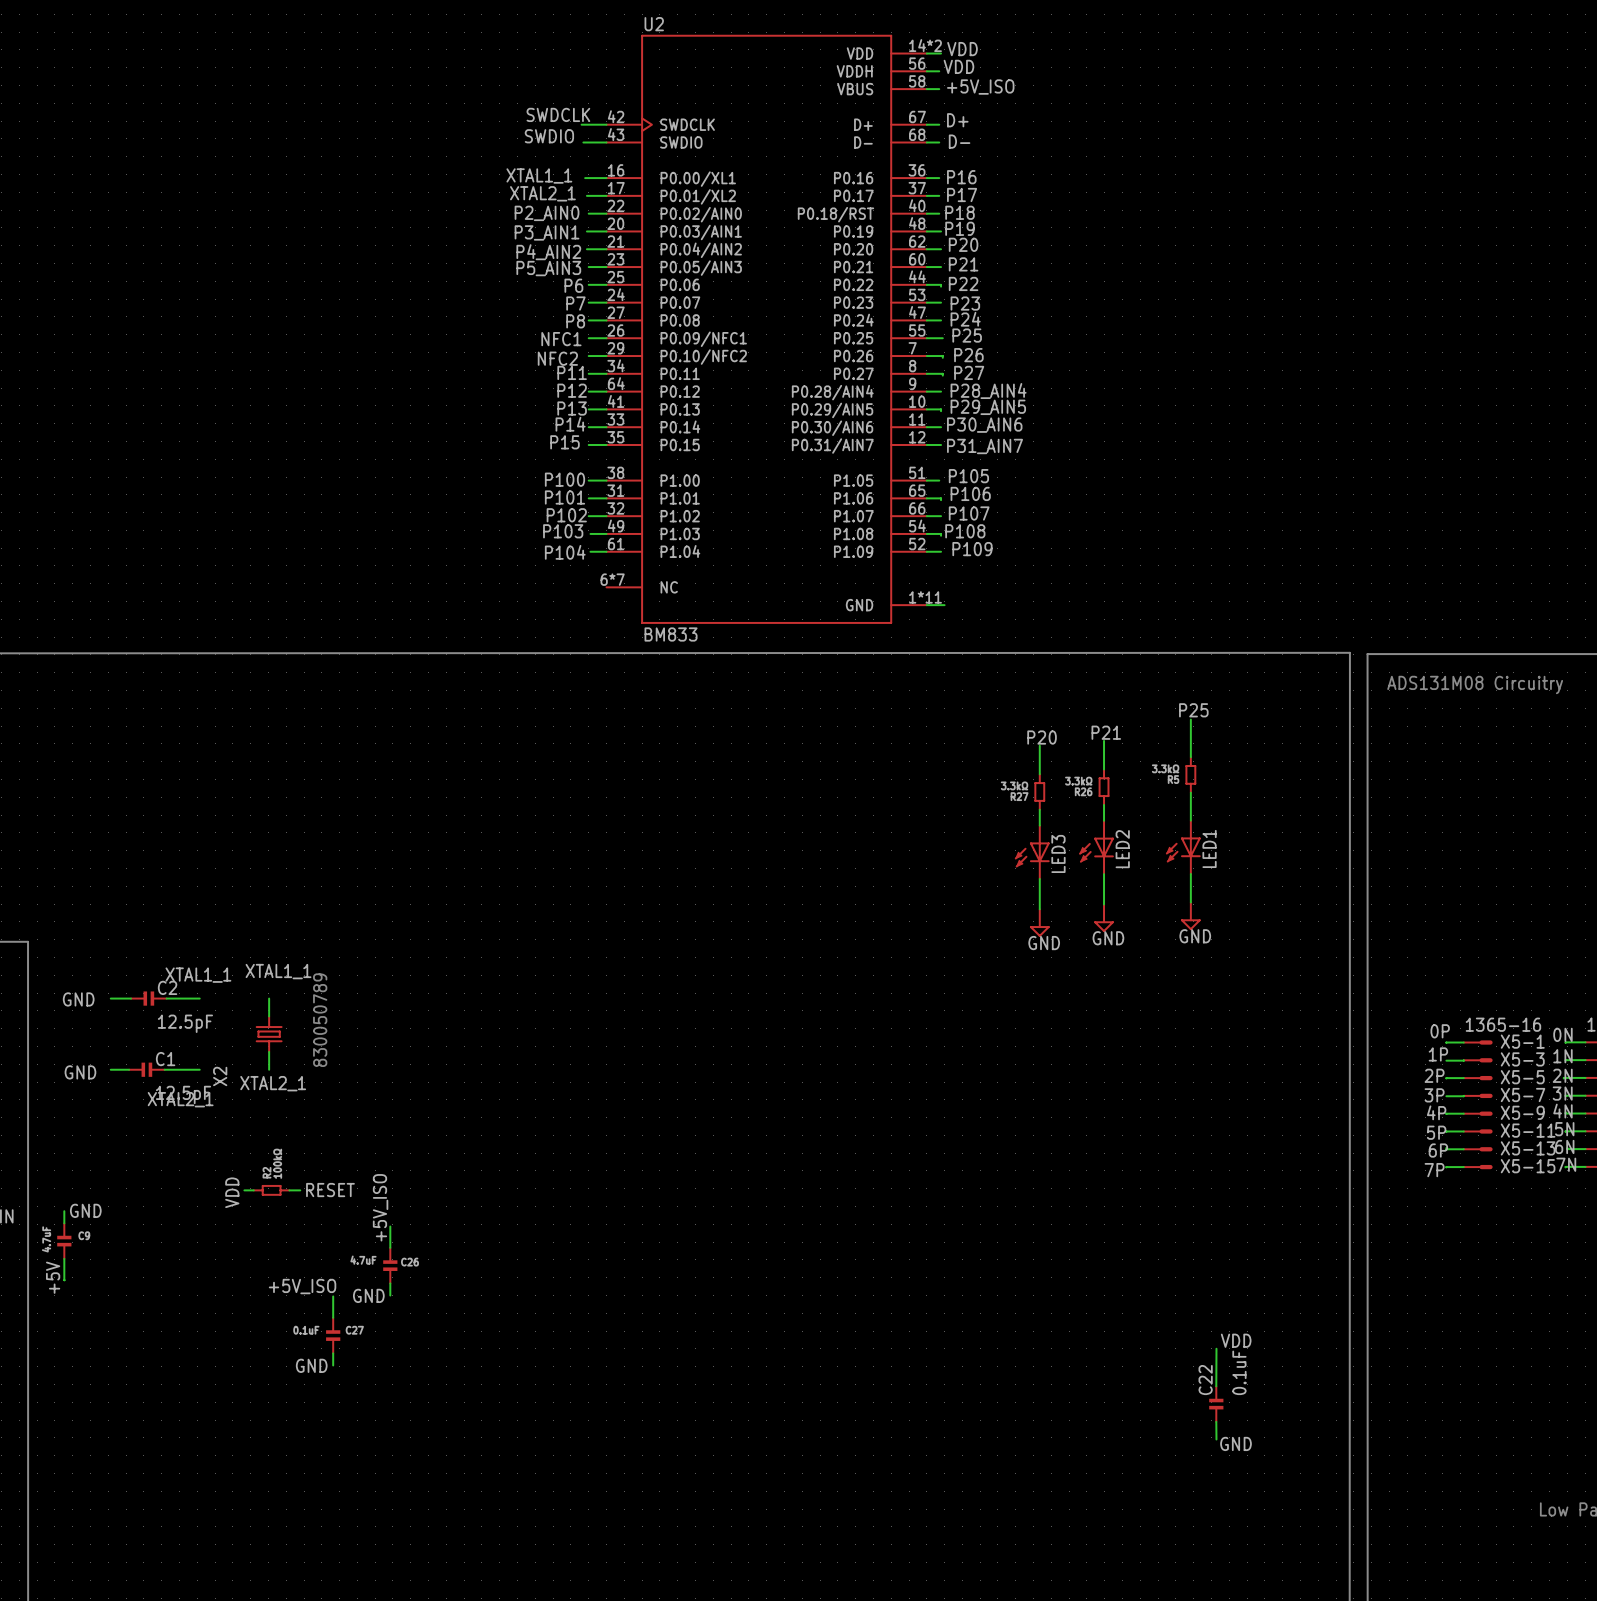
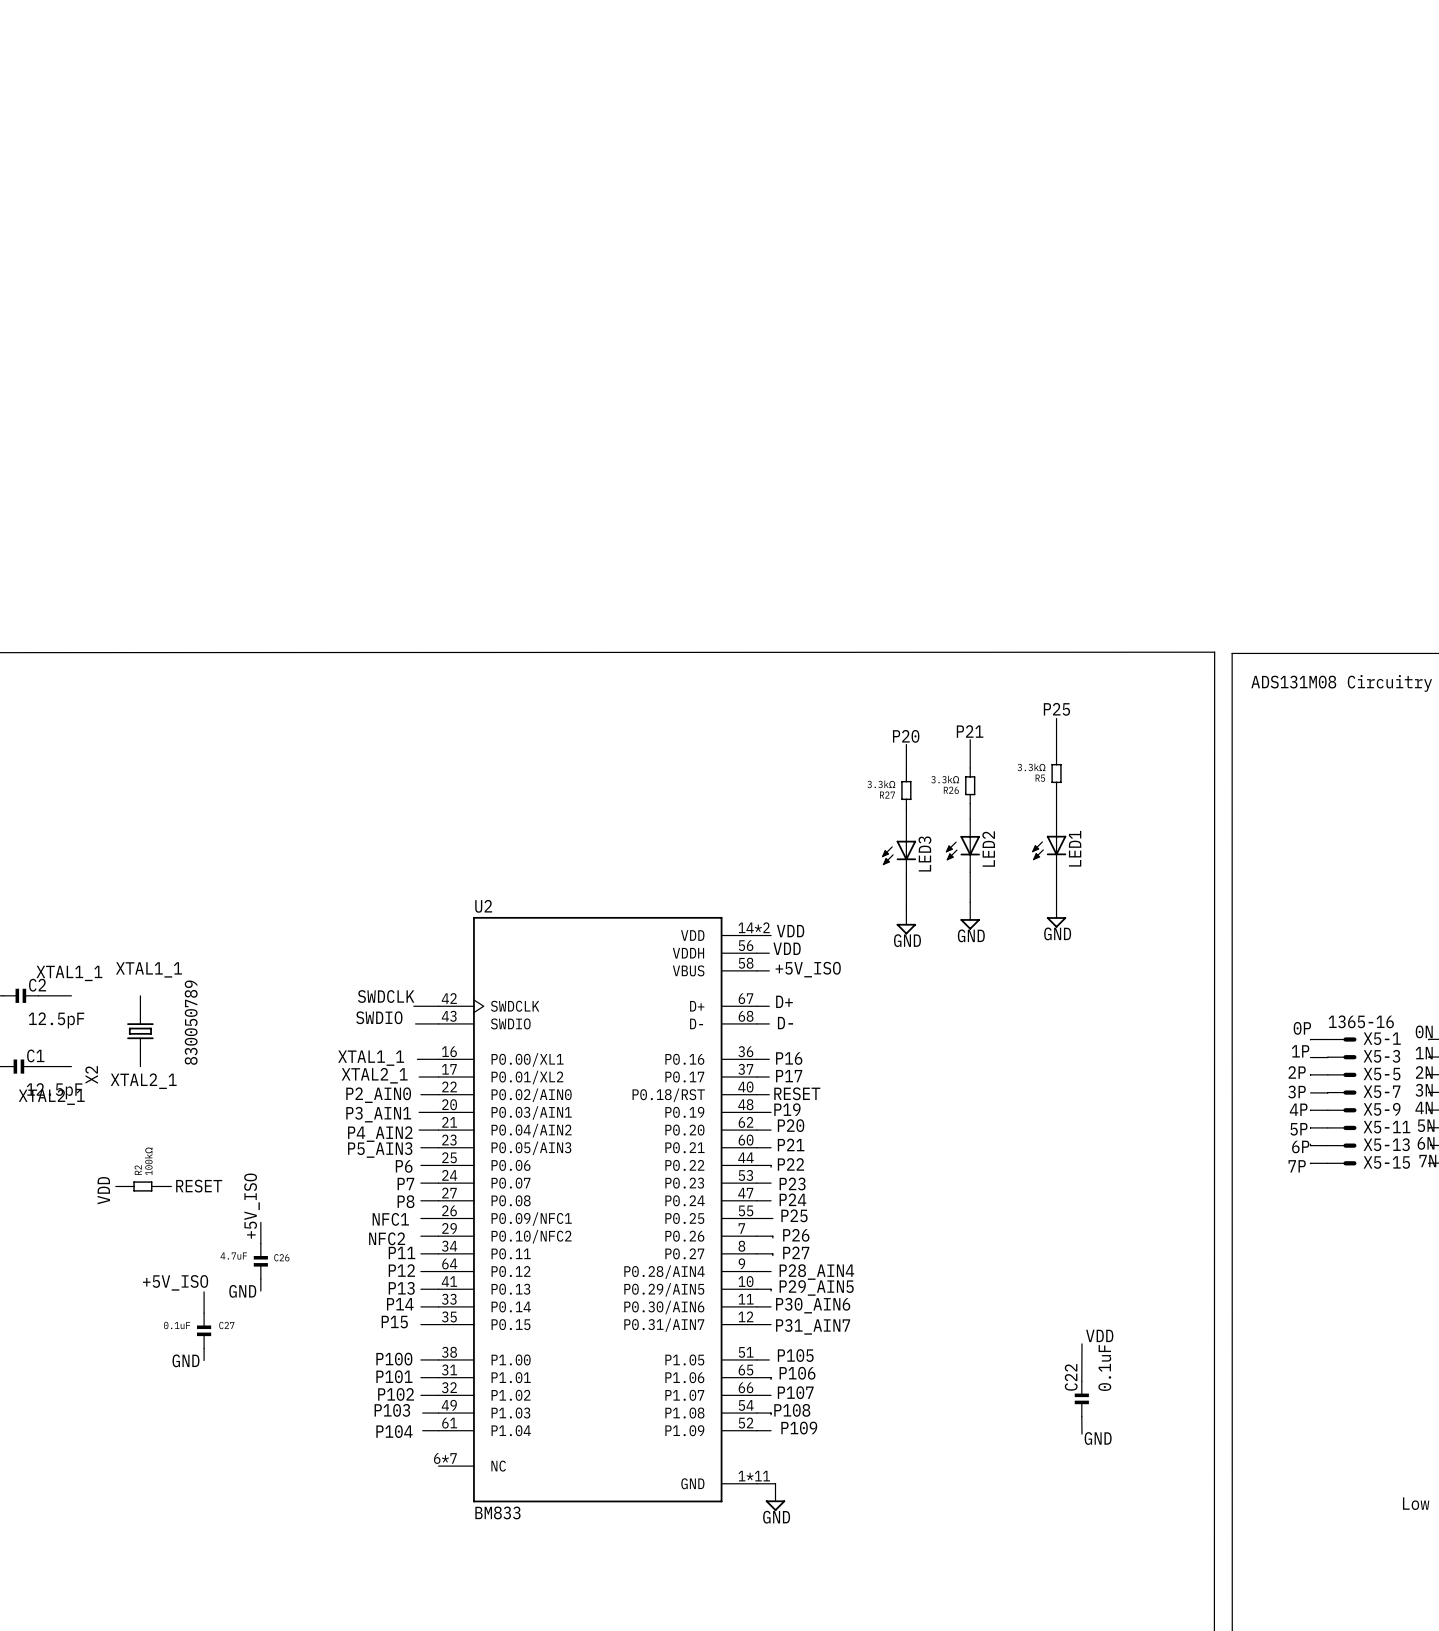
label: VDD (962, 49) -> none
wire: (926, 53) (941, 53) -> none
label: VDD (958, 66) -> none
wire: (926, 71) (939, 71) -> none
label: +5V_ISO (980, 87) -> none
wire: (926, 89) (939, 89) -> none
label: SWDCLK (558, 114) -> none
label: D+ (957, 120) -> none
wire: (581, 124) (606, 124) -> none
wire: (926, 124) (939, 124) -> none
label: SWDIO (549, 136) -> none
label: D- (959, 141) -> none
wire: (583, 142) (606, 142) -> none
wire: (926, 142) (939, 142) -> none
label: XTAL1_1 (539, 176) -> none
label: P16 (961, 177) -> none
wire: (585, 178) (606, 178) -> none
wire: (926, 178) (939, 178) -> none
label: XTAL2_1 (542, 193) -> none
label: P17 (962, 194) -> none
wire: (586, 195) (606, 195) -> none
wire: (926, 195) (939, 195) -> none
label: P18 (960, 212) -> none
label: P2_AIN0 (547, 213) -> none
wire: (588, 213) (606, 213) -> none
wire: (926, 213) (939, 213) -> none
label: P19 (960, 228) -> none
wire: (586, 231) (606, 231) -> none
wire: (926, 231) (941, 231) -> none
label: P3_AIN1 (547, 232) -> none
label: P20 (963, 244) -> none
wire: (586, 249) (606, 249) -> none
wire: (926, 249) (941, 249) -> none
label: P4_AIN2 (548, 252) -> none
label: P21 (963, 264) -> none
wire: (588, 267) (606, 267) -> none
wire: (926, 267) (941, 267) -> none
label: P5_AIN3 (548, 268) -> none
label: P22 (963, 283) -> none
wire: (588, 284) (606, 284) -> none
wire: (926, 284) (941, 284) (941, 286) -> none
label: P6 (573, 285) -> none
wire: (588, 302) (606, 302) -> none
wire: (926, 302) (941, 302) -> none
label: P7 (575, 303) -> none
label: P23 (965, 303) -> none
label: P24 (965, 319) -> none
wire: (588, 320) (606, 320) -> none
wire: (926, 320) (941, 320) -> none
label: P8 (575, 321) -> none
U2 position: (766, 329) -> (597, 1209)
label: P25 (967, 335) -> none
wire: (588, 338) (606, 338) -> none
wire: (926, 338) (942, 338) -> none
label: NFC1 (561, 339) -> none
label: P26 (968, 355) -> none
wire: (588, 356) (606, 356) -> none
wire: (926, 356) (942, 356) (942, 357) -> none
label: NFC2 (557, 358) -> none
label: P11 (572, 372) -> none
label: P27 (969, 372) -> none
wire: (588, 373) (606, 373) -> none
wire: (926, 373) (942, 373) (942, 375) -> none
label: P12 (572, 390) -> none
wire: (588, 391) (606, 391) -> none
wire: (926, 391) (941, 391) -> none
label: P28_AIN4 (988, 391) -> none
label: P29_AIN5 (988, 407) -> none
label: P13 (572, 408) -> none
wire: (588, 409) (606, 409) -> none
wire: (926, 409) (941, 409) (941, 411) -> none
label: P14 (570, 424) -> none
label: P30_AIN6 (984, 425) -> none
wire: (588, 427) (606, 427) -> none
wire: (926, 427) (941, 427) -> none
label: P15 (564, 442) -> none
wire: (588, 444) (606, 444) -> none
wire: (926, 444) (941, 444) -> none
label: P31_AIN7 (985, 446) -> none
label: P105 (968, 476) -> none
label: P100 (564, 479) -> none
wire: (588, 480) (606, 480) -> none
wire: (926, 480) (939, 480) -> none
label: P106 (970, 493) -> none
label: P101 (564, 497) -> none
wire: (588, 498) (606, 498) -> none
wire: (926, 498) (941, 498) (941, 500) -> none
label: P107 (969, 513) -> none
label: P102 (566, 515) -> none
wire: (588, 516) (606, 516) -> none
wire: (926, 516) (941, 516) -> none
label: P103 (563, 531) -> none
label: P108 (965, 531) -> none
wire: (590, 533) (606, 533) -> none
wire: (926, 533) (941, 533) (941, 535) -> none
label: P109 (972, 549) -> none
wire: (590, 551) (606, 551) -> none
wire: (926, 551) (941, 551) -> none
label: P104 (565, 552) -> none
wire: (926, 605) (944, 605) -> none
label: none -> VDD (790, 931)
wire: none -> (756, 935) (771, 935)
label: none -> VDD (787, 948)
wire: none -> (756, 953) (769, 953)
label: none -> +5V_ISO (808, 969)
wire: none -> (756, 970) (769, 970)
label: none -> SWDCLK (386, 996)
label: none -> D+ (784, 1001)
wire: none -> (413, 1006) (438, 1006)
wire: none -> (756, 1006) (769, 1006)
label: none -> SWDIO (379, 1017)
label: none -> D- (785, 1023)
wire: none -> (415, 1023) (438, 1023)
wire: none -> (756, 1023) (769, 1023)
label: none -> XTAL1_1 (371, 1058)
label: none -> P16 (789, 1058)
wire: none -> (417, 1059) (438, 1059)
wire: none -> (756, 1059) (769, 1059)
label: none -> XTAL2_1 (374, 1075)
label: none -> P17 (789, 1076)
wire: none -> (419, 1077) (438, 1077)
wire: none -> (756, 1077) (769, 1077)
label: none -> P2_AIN0 (378, 1095)
label: none -> RESET (797, 1093)
wire: none -> (420, 1094) (438, 1094)
wire: none -> (756, 1094) (769, 1094)
label: none -> P19 (787, 1109)
wire: none -> (419, 1112) (438, 1112)
wire: none -> (756, 1112) (771, 1112)
label: none -> P3_AIN1 (378, 1114)
label: none -> P20 (791, 1125)
wire: none -> (419, 1130) (438, 1130)
wire: none -> (756, 1130) (771, 1130)
label: none -> P4_AIN2 (380, 1134)
label: none -> P21 (791, 1144)
wire: none -> (420, 1147) (438, 1147)
wire: none -> (756, 1147) (771, 1147)
label: none -> P5_AIN3 (380, 1150)
label: none -> P22 (790, 1164)
wire: none -> (420, 1165) (438, 1165)
wire: none -> (756, 1165) (771, 1165) (771, 1167)
label: none -> P6 (404, 1166)
label: none -> P7 (405, 1184)
wire: none -> (420, 1183) (438, 1183)
wire: none -> (756, 1183) (771, 1183)
label: none -> P23 (792, 1184)
label: none -> P24 (792, 1199)
wire: none -> (420, 1200) (438, 1200)
wire: none -> (756, 1200) (771, 1200)
label: none -> P8 (406, 1201)
label: none -> P25 (794, 1215)
wire: none -> (420, 1218) (438, 1218)
wire: none -> (756, 1218) (772, 1218)
label: none -> NFC1 (390, 1219)
label: none -> P26 (796, 1235)
wire: none -> (420, 1236) (438, 1236)
wire: none -> (756, 1236) (772, 1236) (772, 1237)
label: none -> NFC2 (387, 1238)
label: none -> P11 (402, 1252)
label: none -> P27 (796, 1252)
wire: none -> (420, 1253) (438, 1253)
wire: none -> (756, 1253) (772, 1253) (772, 1255)
label: none -> P12 (401, 1270)
wire: none -> (420, 1271) (438, 1271)
wire: none -> (756, 1271) (771, 1271)
label: none -> P28_AIN4 (816, 1272)
label: none -> P29_AIN5 (816, 1287)
label: none -> P13 (401, 1288)
wire: none -> (420, 1289) (438, 1289)
wire: none -> (756, 1289) (771, 1289) (771, 1291)
label: none -> P14 (400, 1304)
label: none -> P30_AIN6 (813, 1305)
wire: none -> (420, 1306) (438, 1306)
wire: none -> (756, 1306) (771, 1306)
label: none -> P15 (394, 1322)
wire: none -> (420, 1324) (438, 1324)
wire: none -> (756, 1324) (771, 1324)
label: none -> P31_AIN7 (813, 1326)
label: none -> P105 (795, 1355)
label: none -> P100 (394, 1359)
wire: none -> (420, 1359) (438, 1359)
wire: none -> (756, 1359) (769, 1359)
label: none -> P106 (797, 1373)
label: none -> P101 (394, 1376)
wire: none -> (420, 1377) (438, 1377)
wire: none -> (756, 1377) (771, 1377) (771, 1379)
label: none -> P107 (795, 1392)
label: none -> P102 (396, 1394)
wire: none -> (420, 1395) (438, 1395)
wire: none -> (756, 1395) (771, 1395)
label: none -> P103 (392, 1410)
label: none -> P108 (792, 1410)
wire: none -> (422, 1413) (438, 1413)
wire: none -> (756, 1413) (771, 1413) (771, 1414)
label: none -> P109 (799, 1428)
label: none -> P104 (394, 1431)
wire: none -> (422, 1430) (438, 1430)
wire: none -> (756, 1430) (771, 1430)
wire: none -> (775, 1483) (756, 1483)
power symbol: none -> GND (775, 1497)

